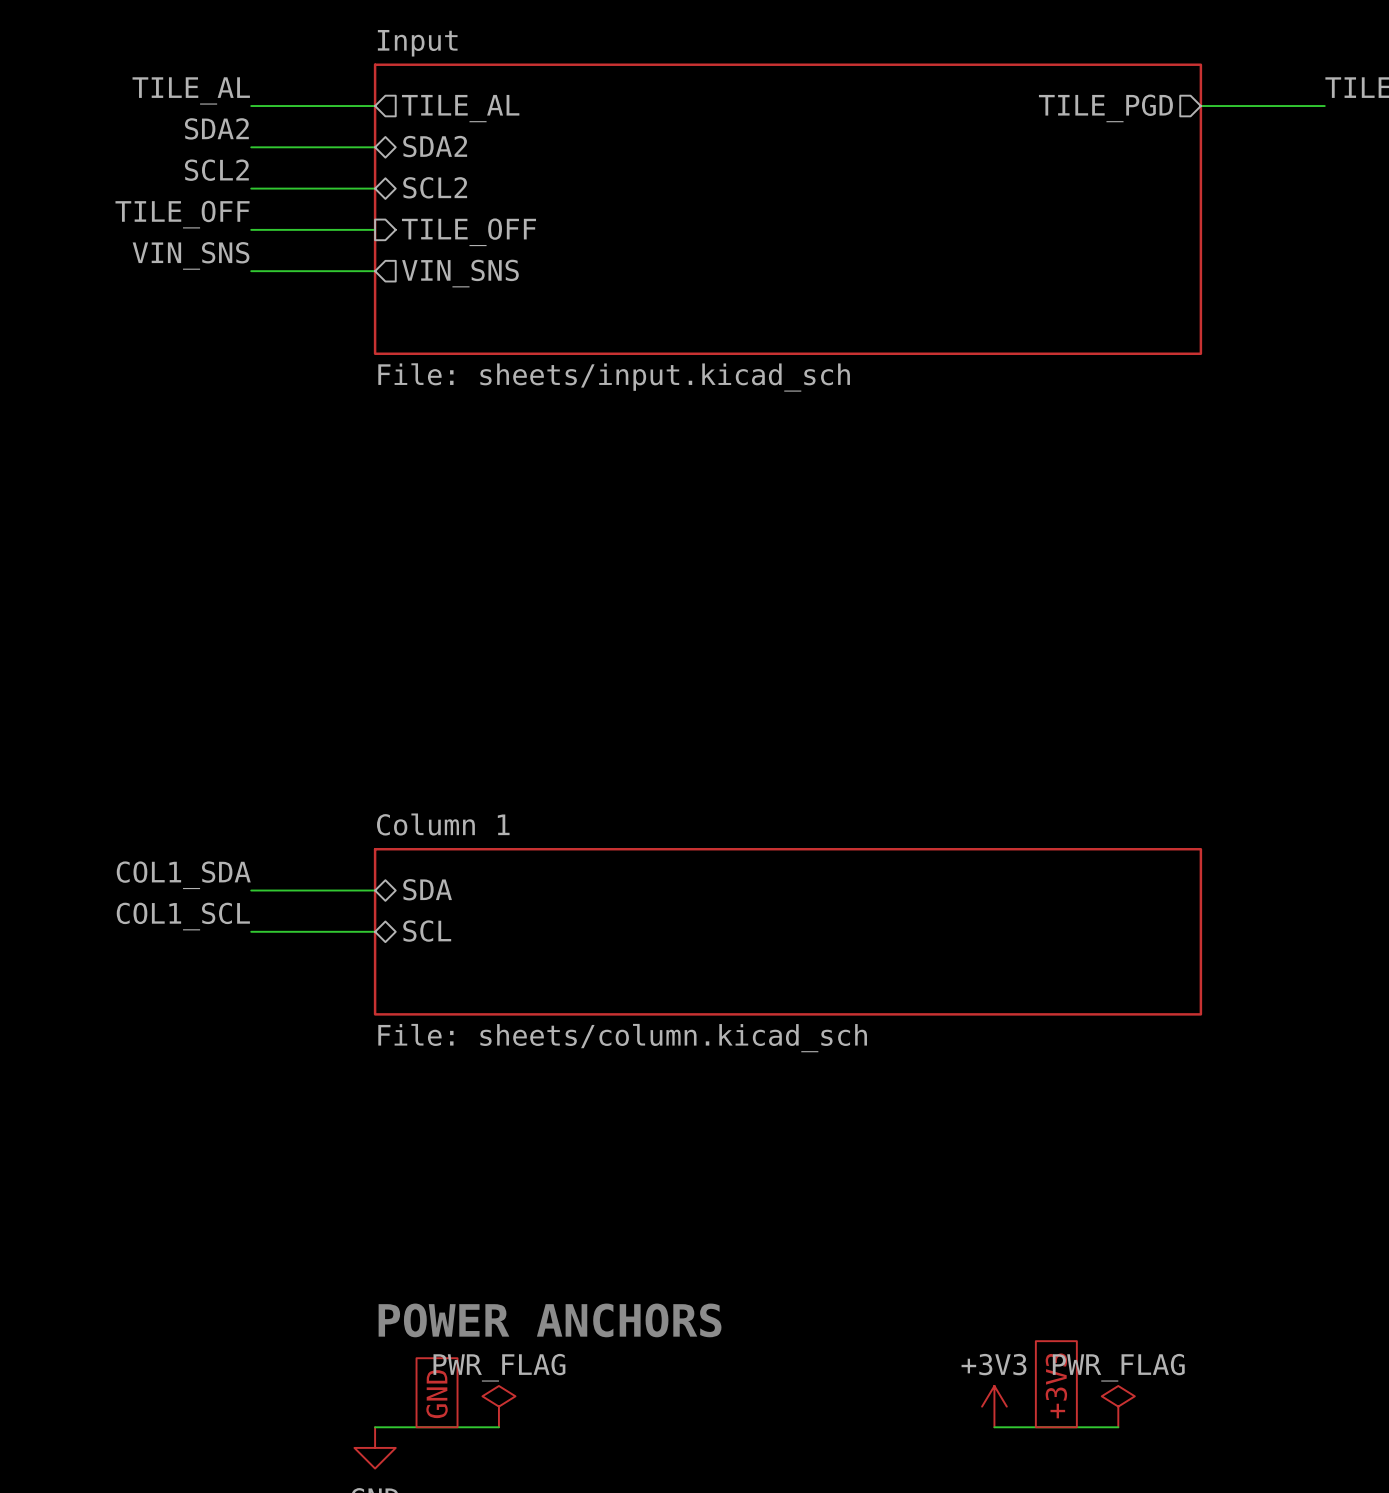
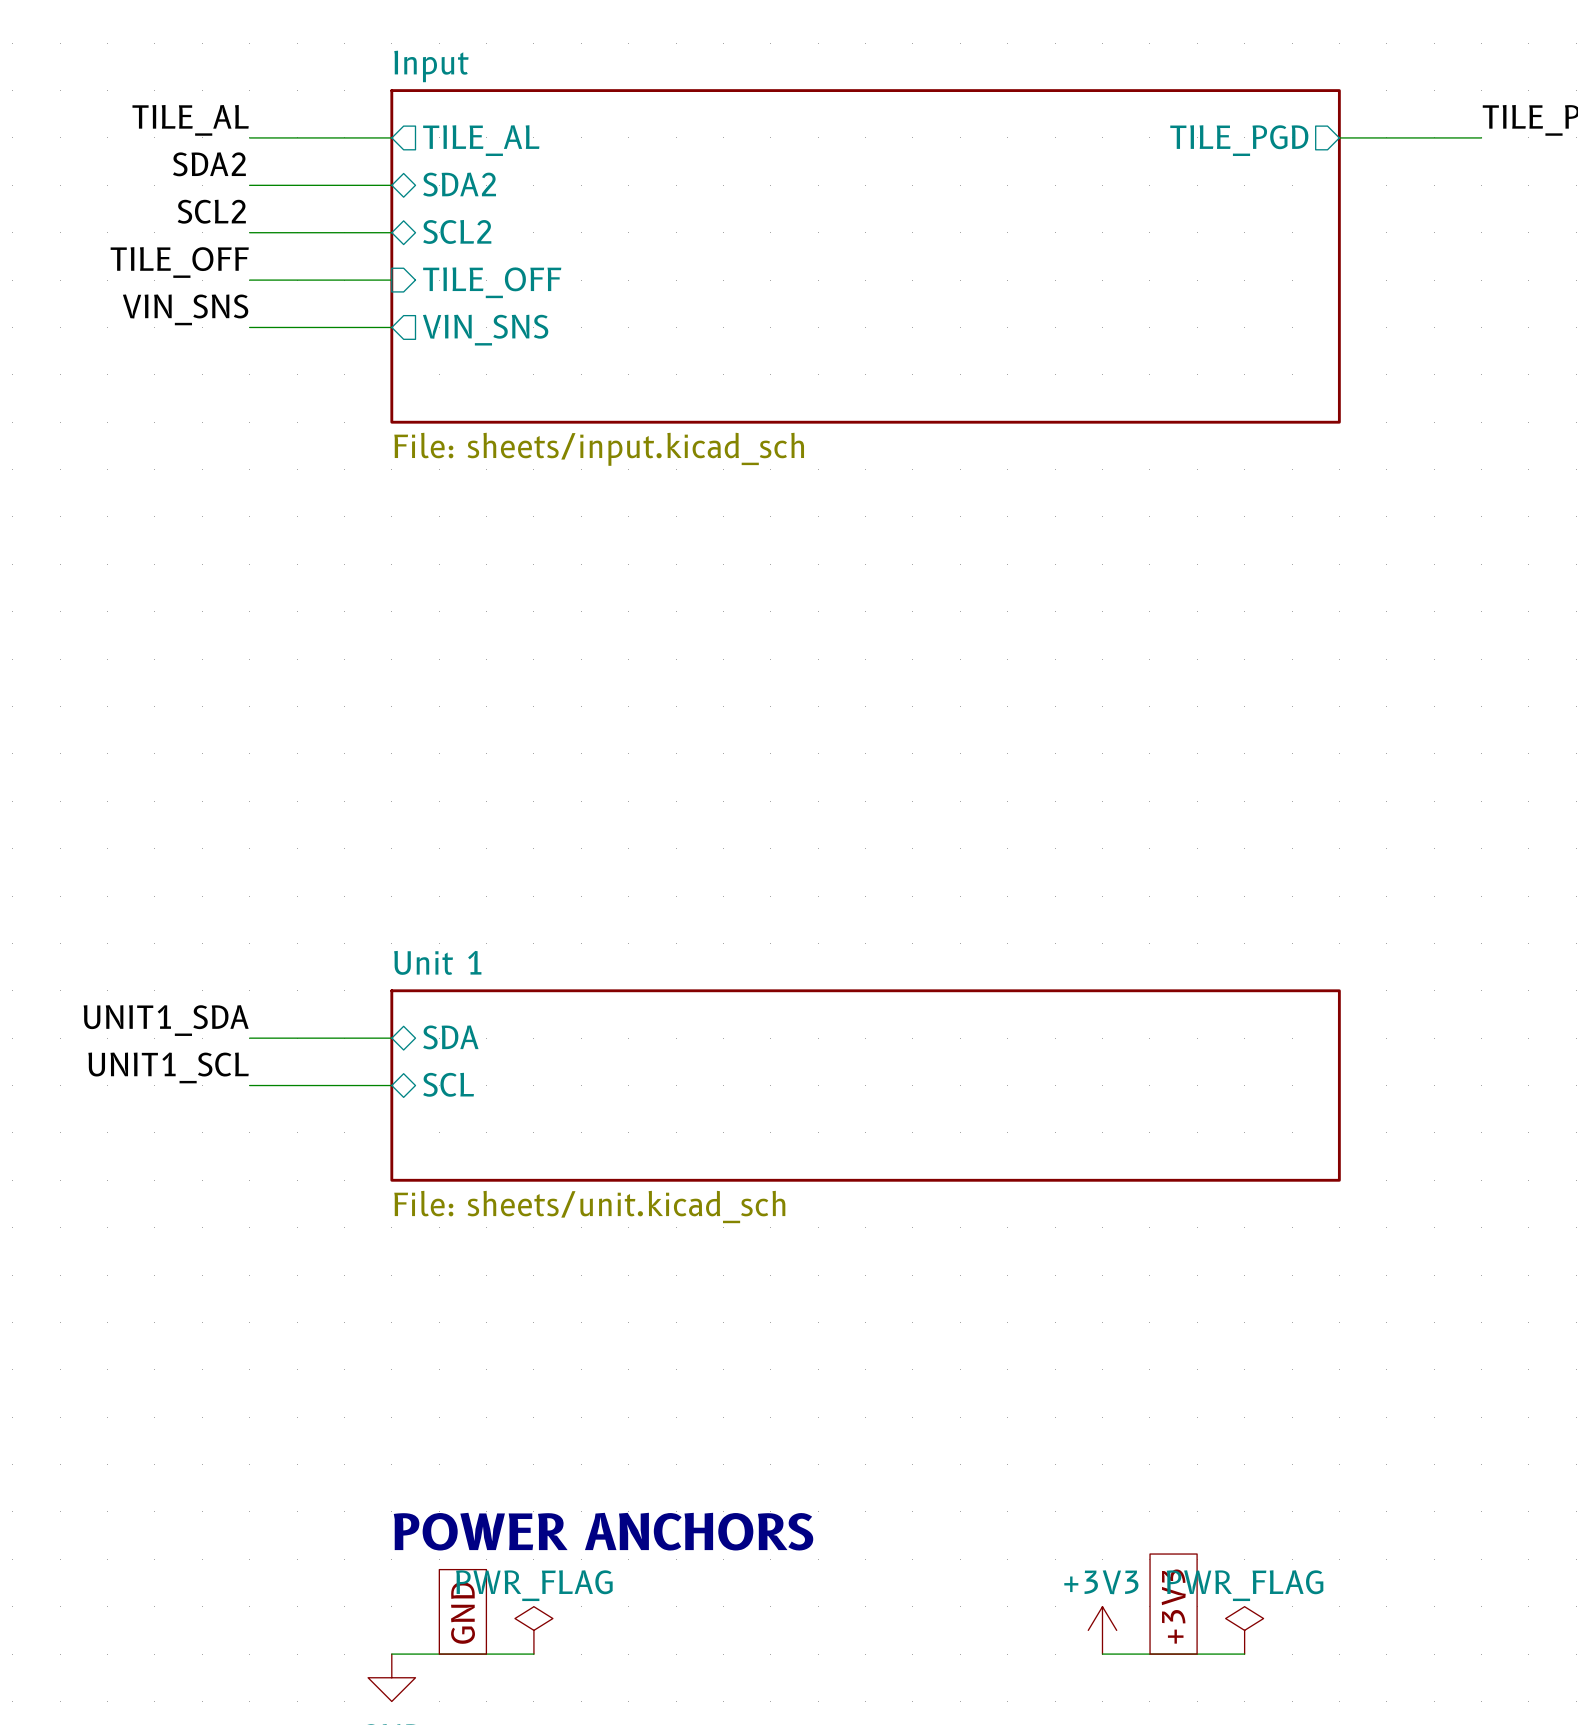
sheet Column 1 name: Column 1 (443, 824) -> Unit 1 (437, 962)
label: COL1_SDA (183, 875) -> UNIT1_SDA (166, 1020)
label: COL1_SCL (183, 916) -> UNIT1_SCL (168, 1067)
sheet Column 1 value: File: sheets/column.kicad_sch (622, 1038) -> File: sheets/unit.kicad_sch (589, 1207)

